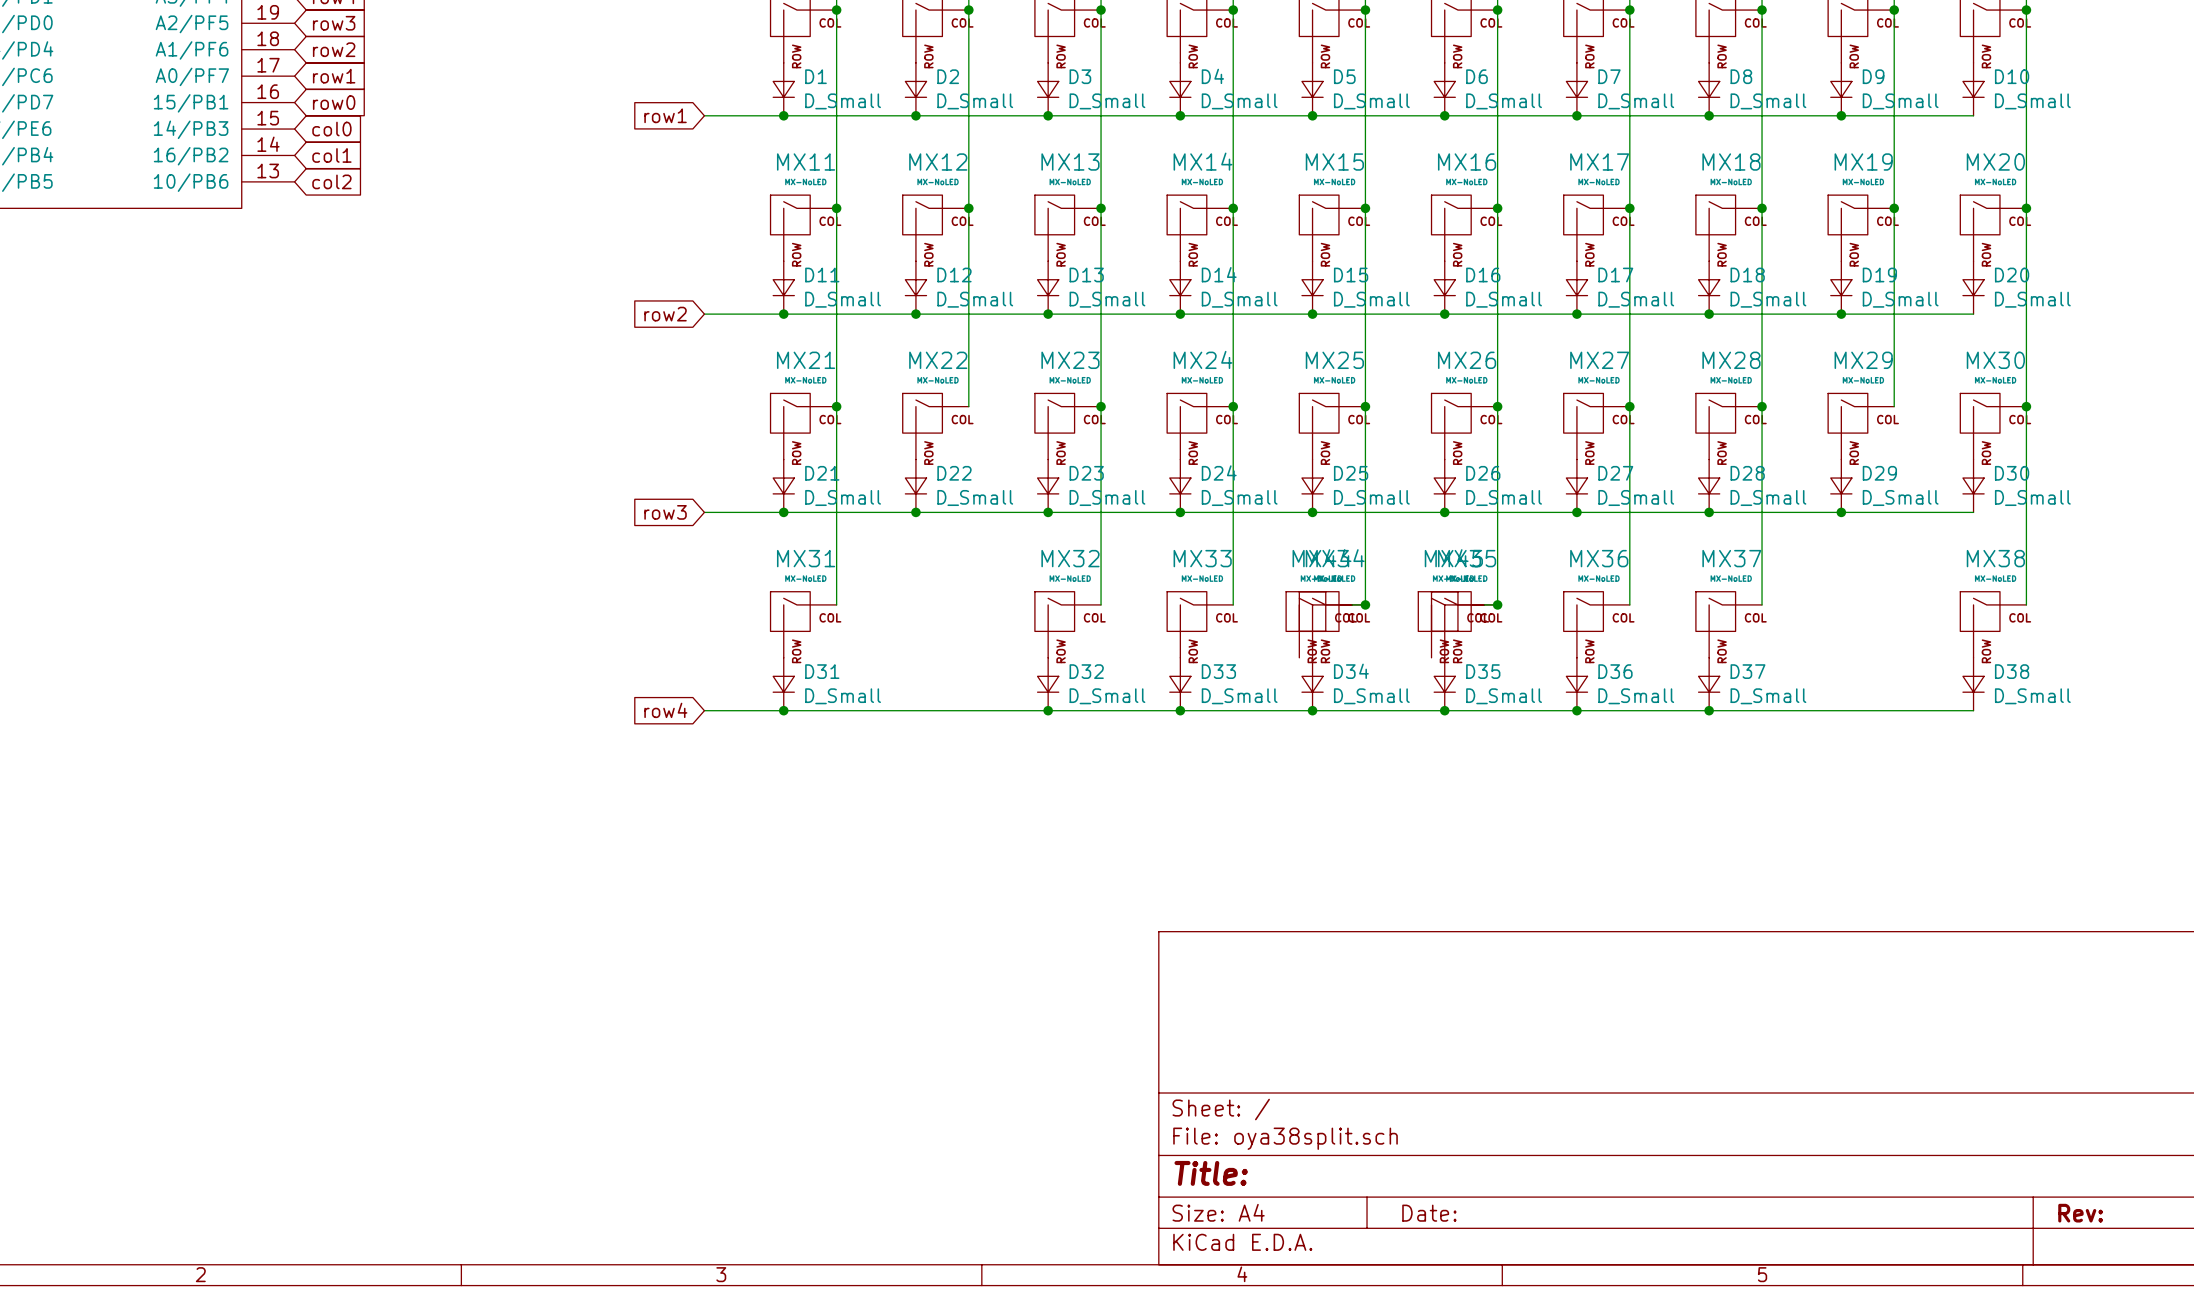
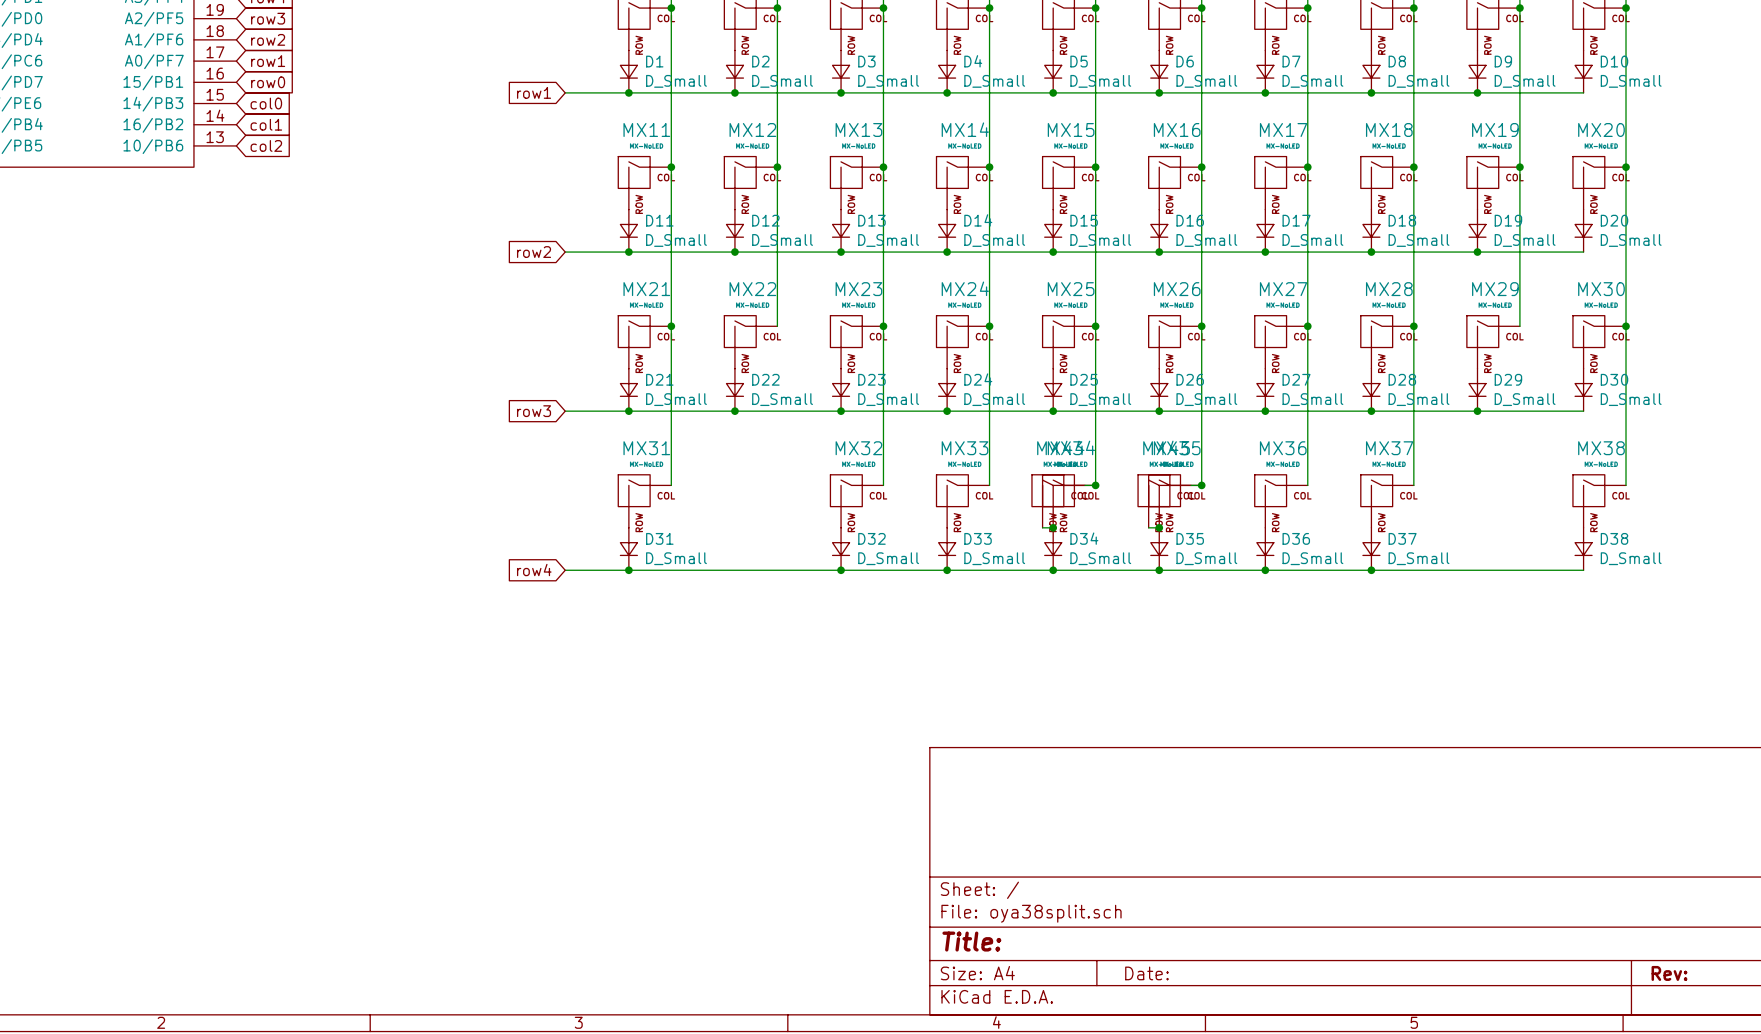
wire: none -> (1042, 527) (1053, 527)
junction: none -> (1053, 527)
wire: none -> (1148, 527) (1159, 527)
junction: none -> (1159, 527)

